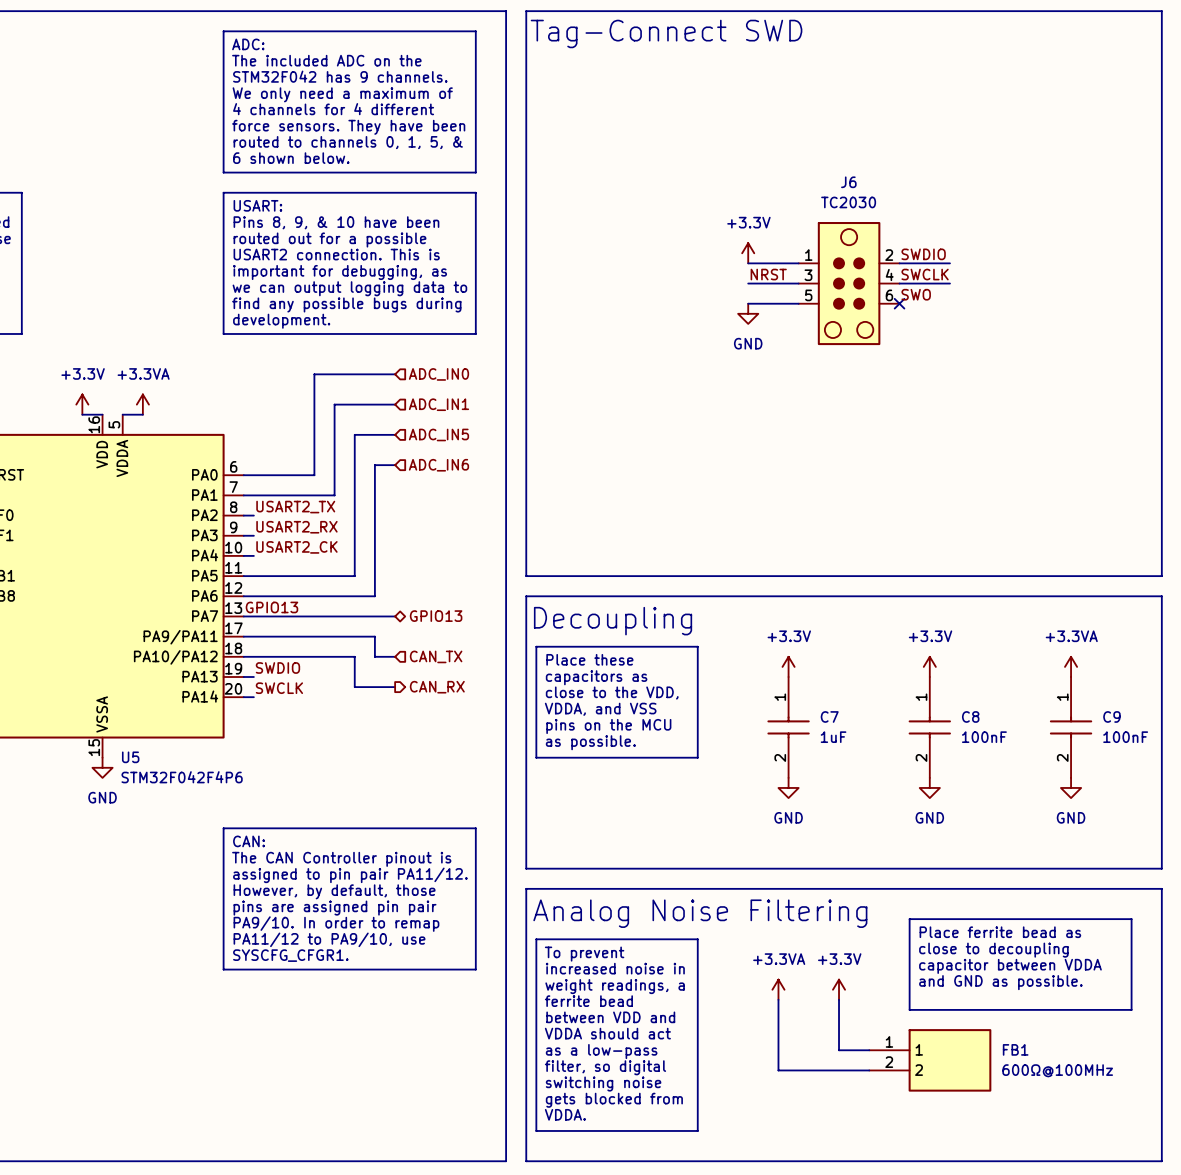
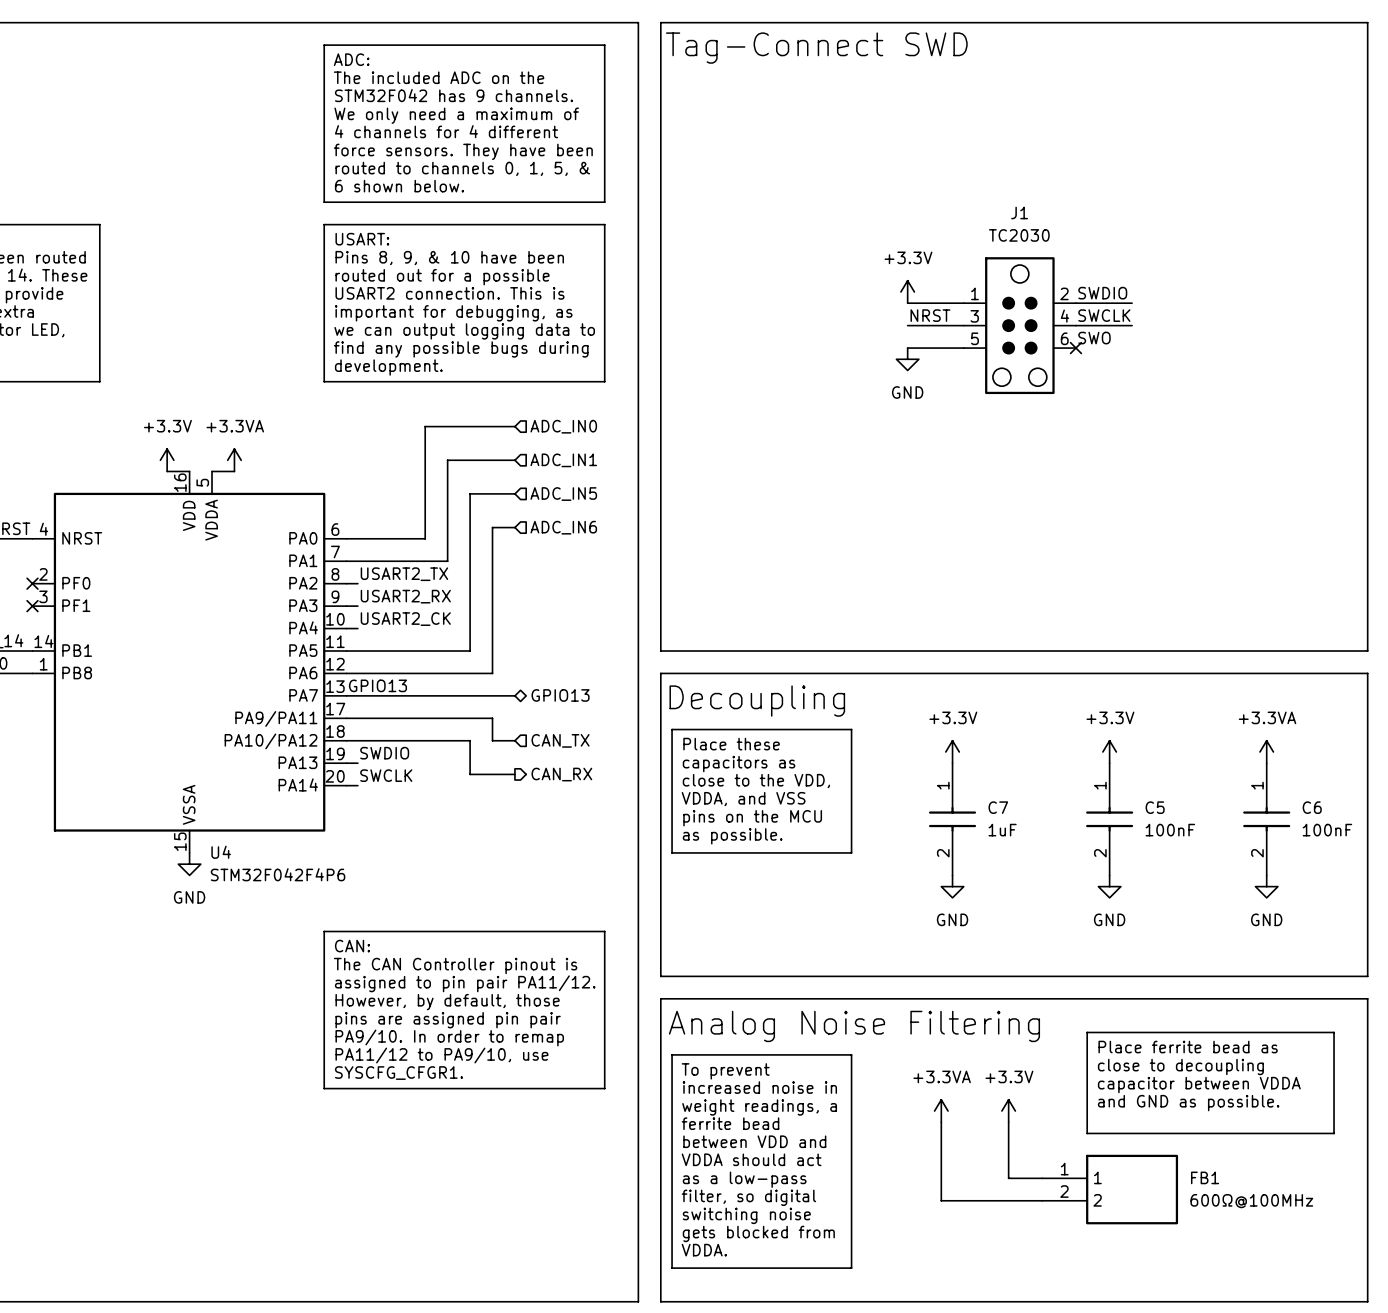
J6 name: J6 (848, 182) -> J1 (1019, 212)
C8 name: C8 (970, 716) -> C5 (1155, 807)
C9 name: C9 (1111, 716) -> C6 (1312, 807)
U5 name: U5 (130, 757) -> U4 (221, 852)

